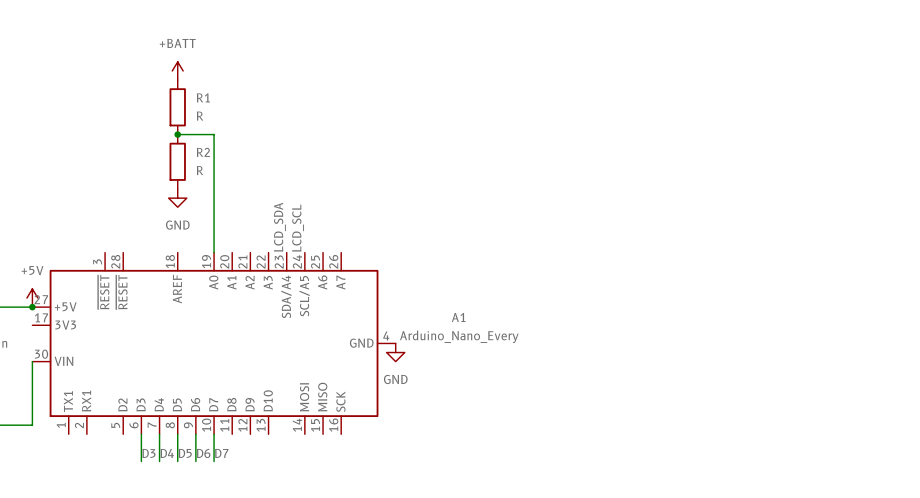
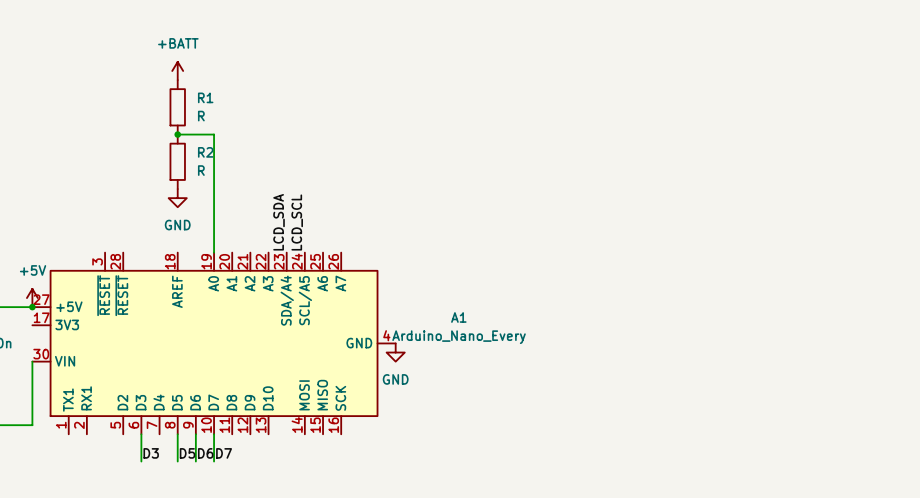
wire: (159, 434) (159, 461) -> none
label: D4 (167, 453) -> none

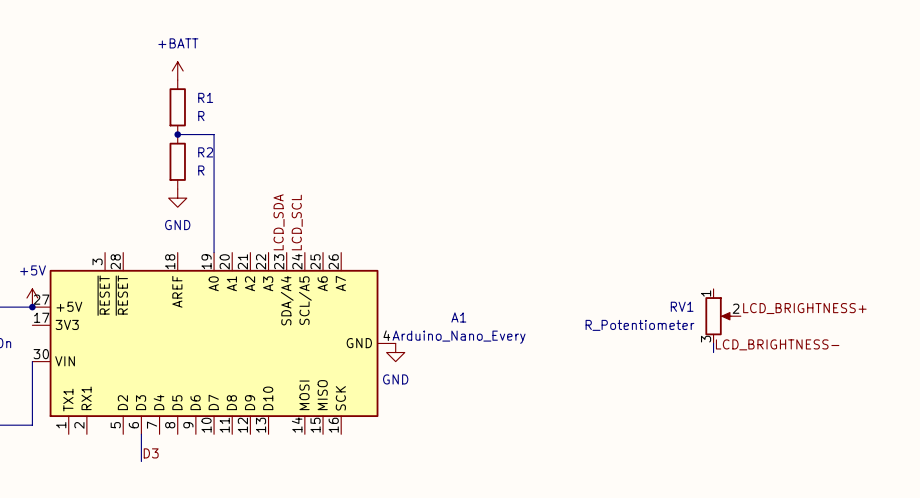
label: none -> LCD_BRIGHTNESS+ (804, 308)
RV1: none -> R_Potentiometer (723, 316)
wire: none -> (713, 343) (713, 352)
label: none -> LCD_BRIGHTNESS- (777, 344)
wire: (177, 434) (177, 461) -> none
wire: (195, 434) (195, 461) -> none
wire: (214, 434) (214, 461) -> none
label: D5 (187, 453) -> none
label: D6 (205, 453) -> none
label: D7 (224, 453) -> none

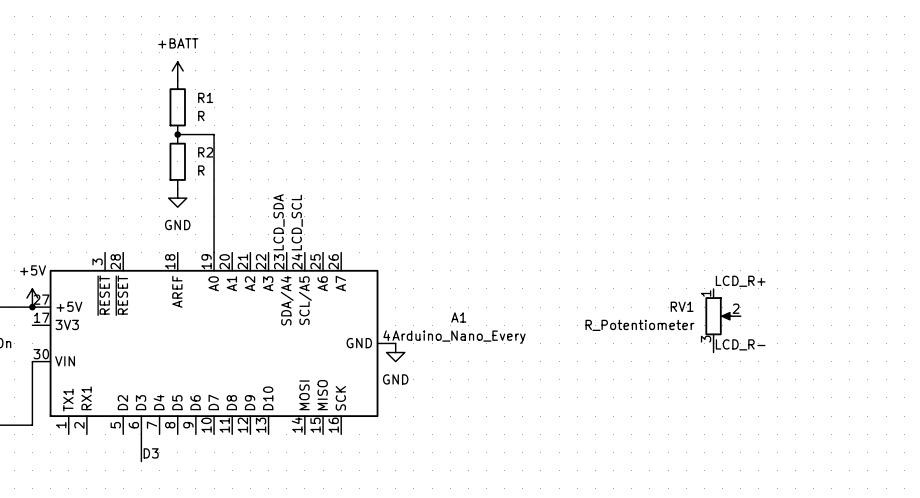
label: none -> LCD_R+ (740, 281)
label: LCD_BRIGHTNESS+ (804, 308) -> none
label: LCD_BRIGHTNESS- (777, 344) -> LCD_R- (740, 344)

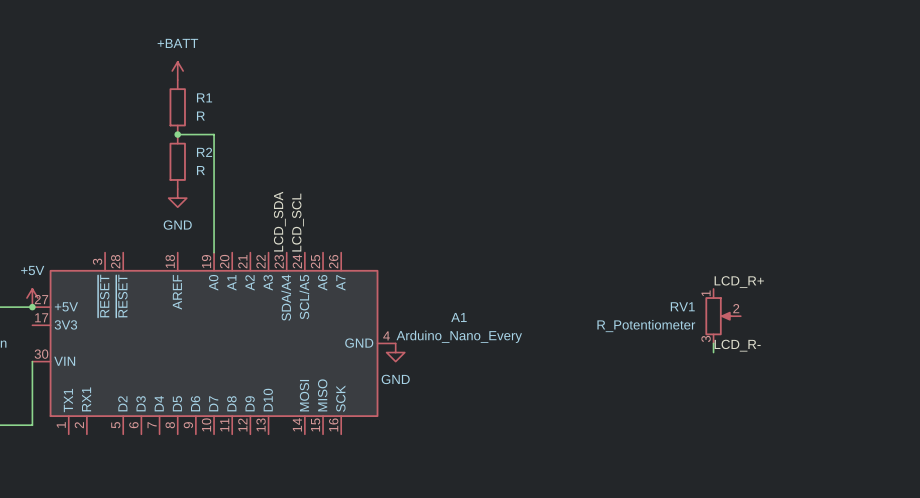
wire: (141, 434) (141, 461) -> none
label: D3 (151, 453) -> none

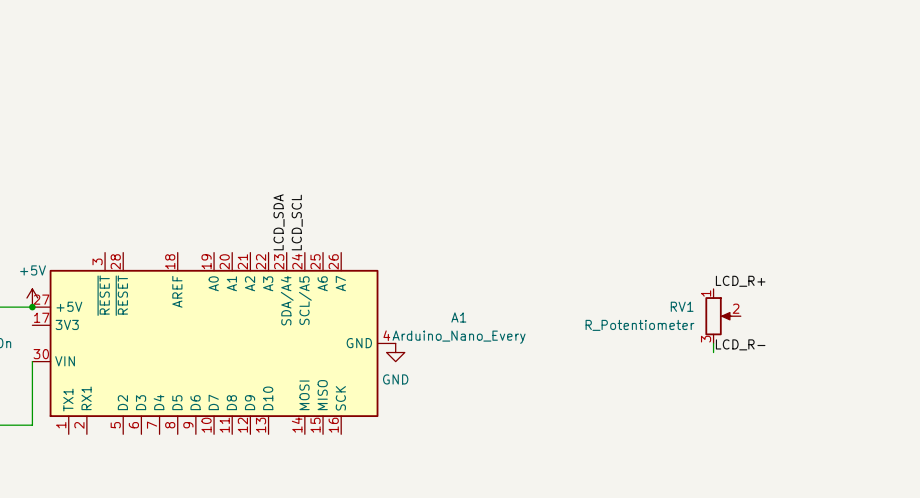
power symbol: +BATT (177, 70) -> none
R1: R (177, 107) -> none
wire: (177, 134) (214, 134) (214, 252) -> none
junction: (177, 134) -> none
R2: R (177, 161) -> none
power symbol: GND (177, 198) -> none

